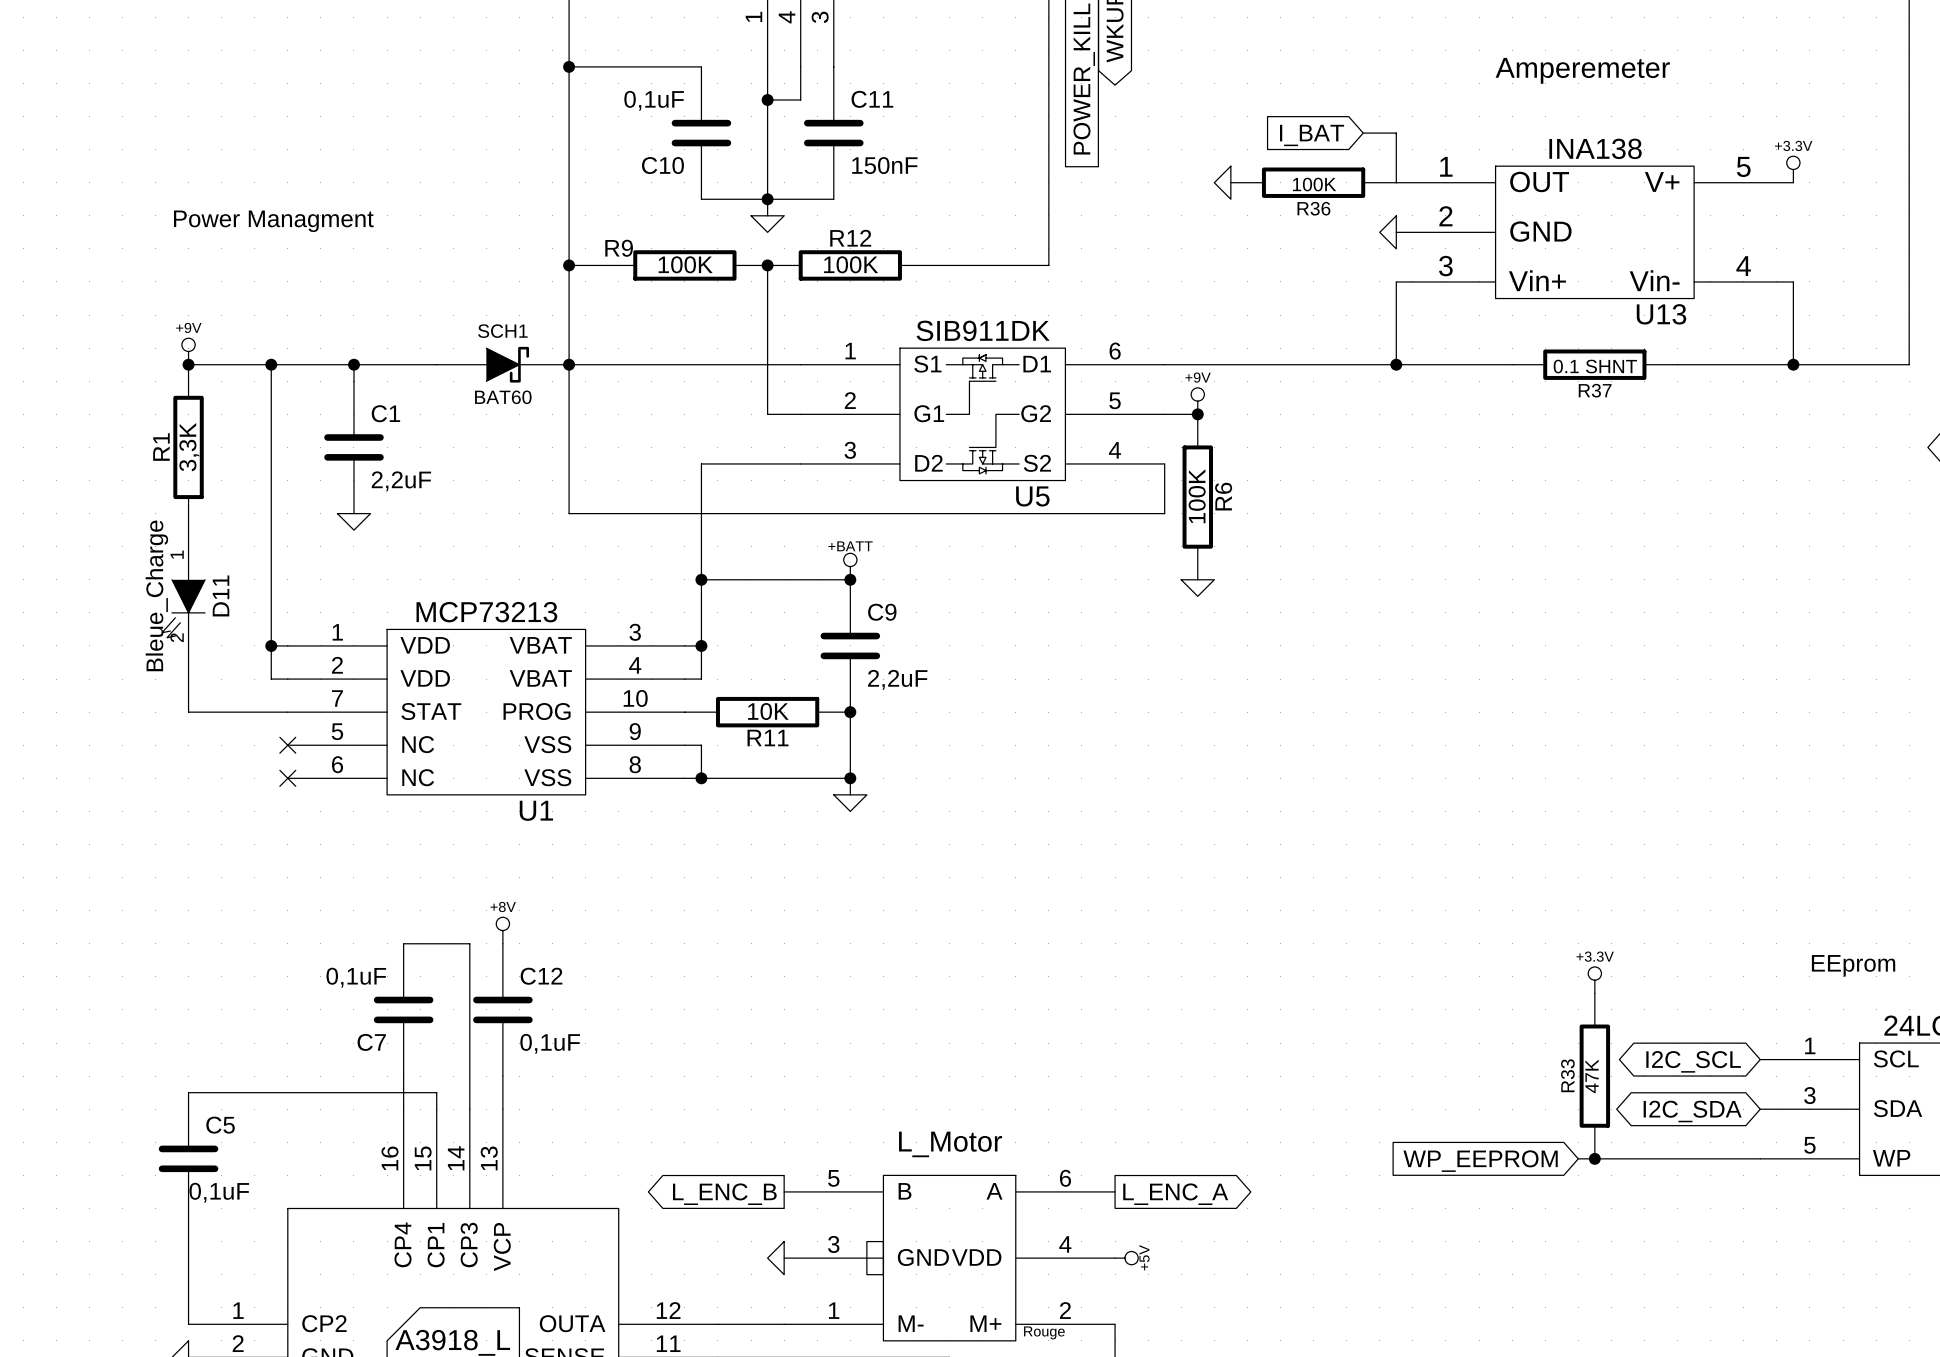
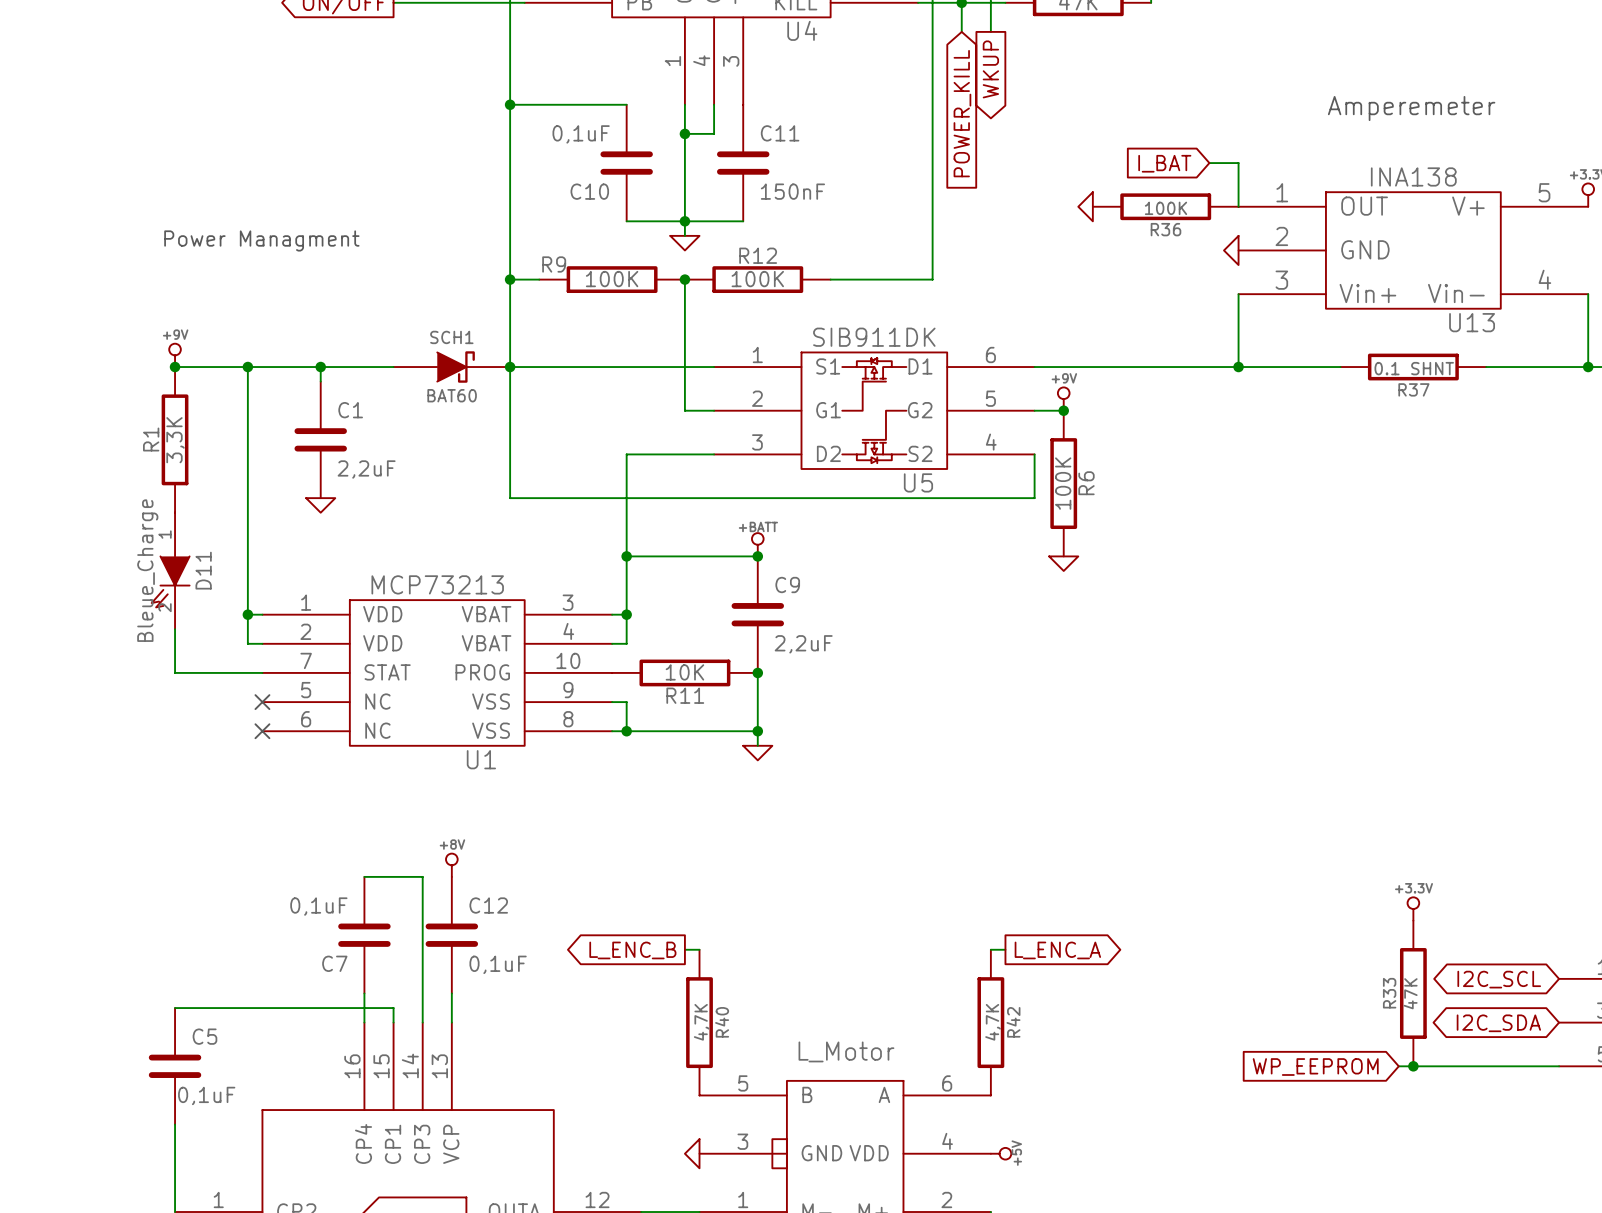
wire: none -> (684, 949) (699, 949)
wire: none -> (990, 949) (1005, 949)
R40: none -> 4,7K (699, 1022)
R42: none -> 4,7K (990, 1022)
global label position: L_ENC_B (724, 1194) -> L_ENC_B (632, 950)
global label position: L_ENC_A (1175, 1194) -> L_ENC_A (1057, 950)

